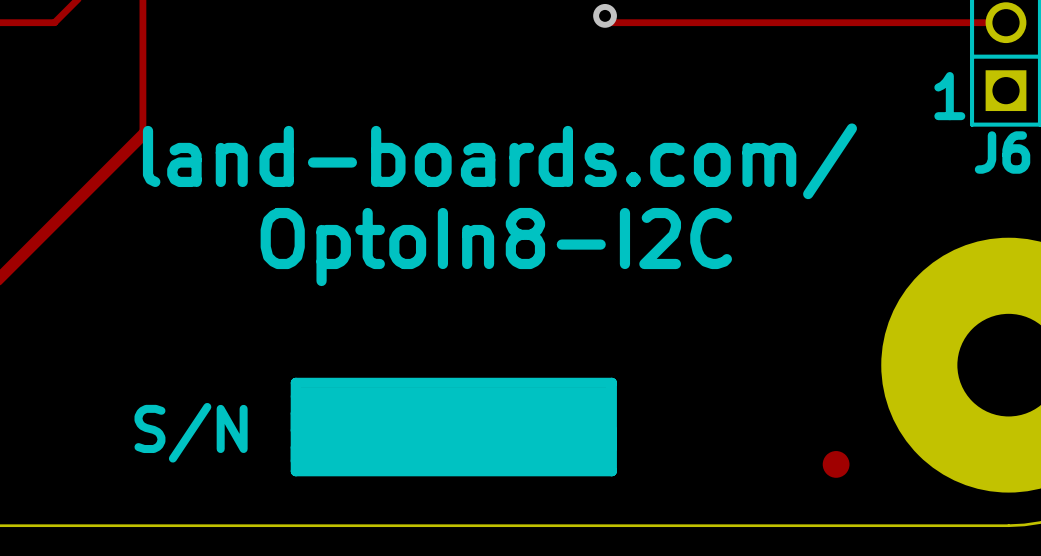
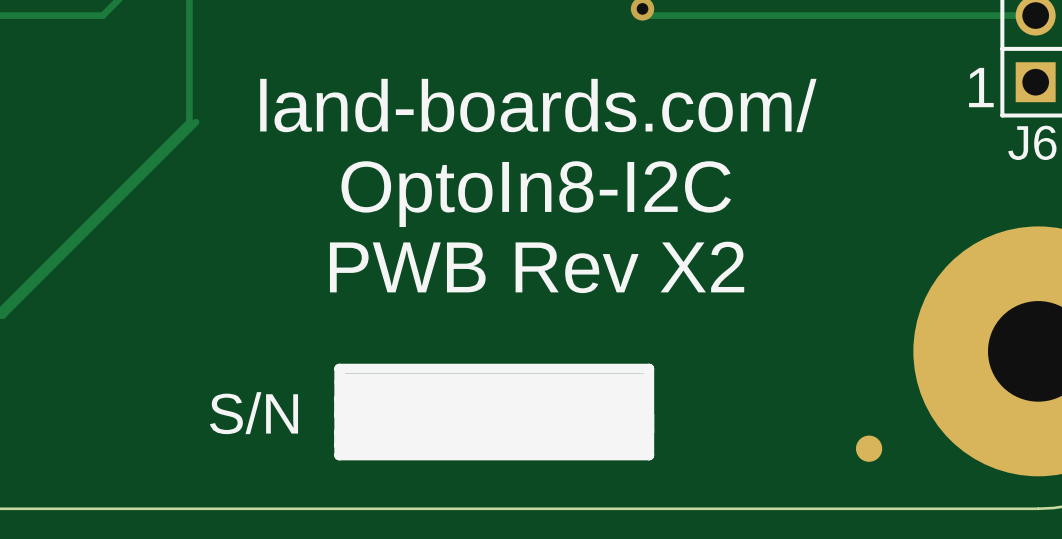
text position: land-boards.com/ (499, 161) -> land-boards.com/ (538, 105)
text position: OptoIn8-I2C (496, 246) -> OptoIn8-I2C (536, 194)
text: none -> PWB Rev X2 (537, 267)

